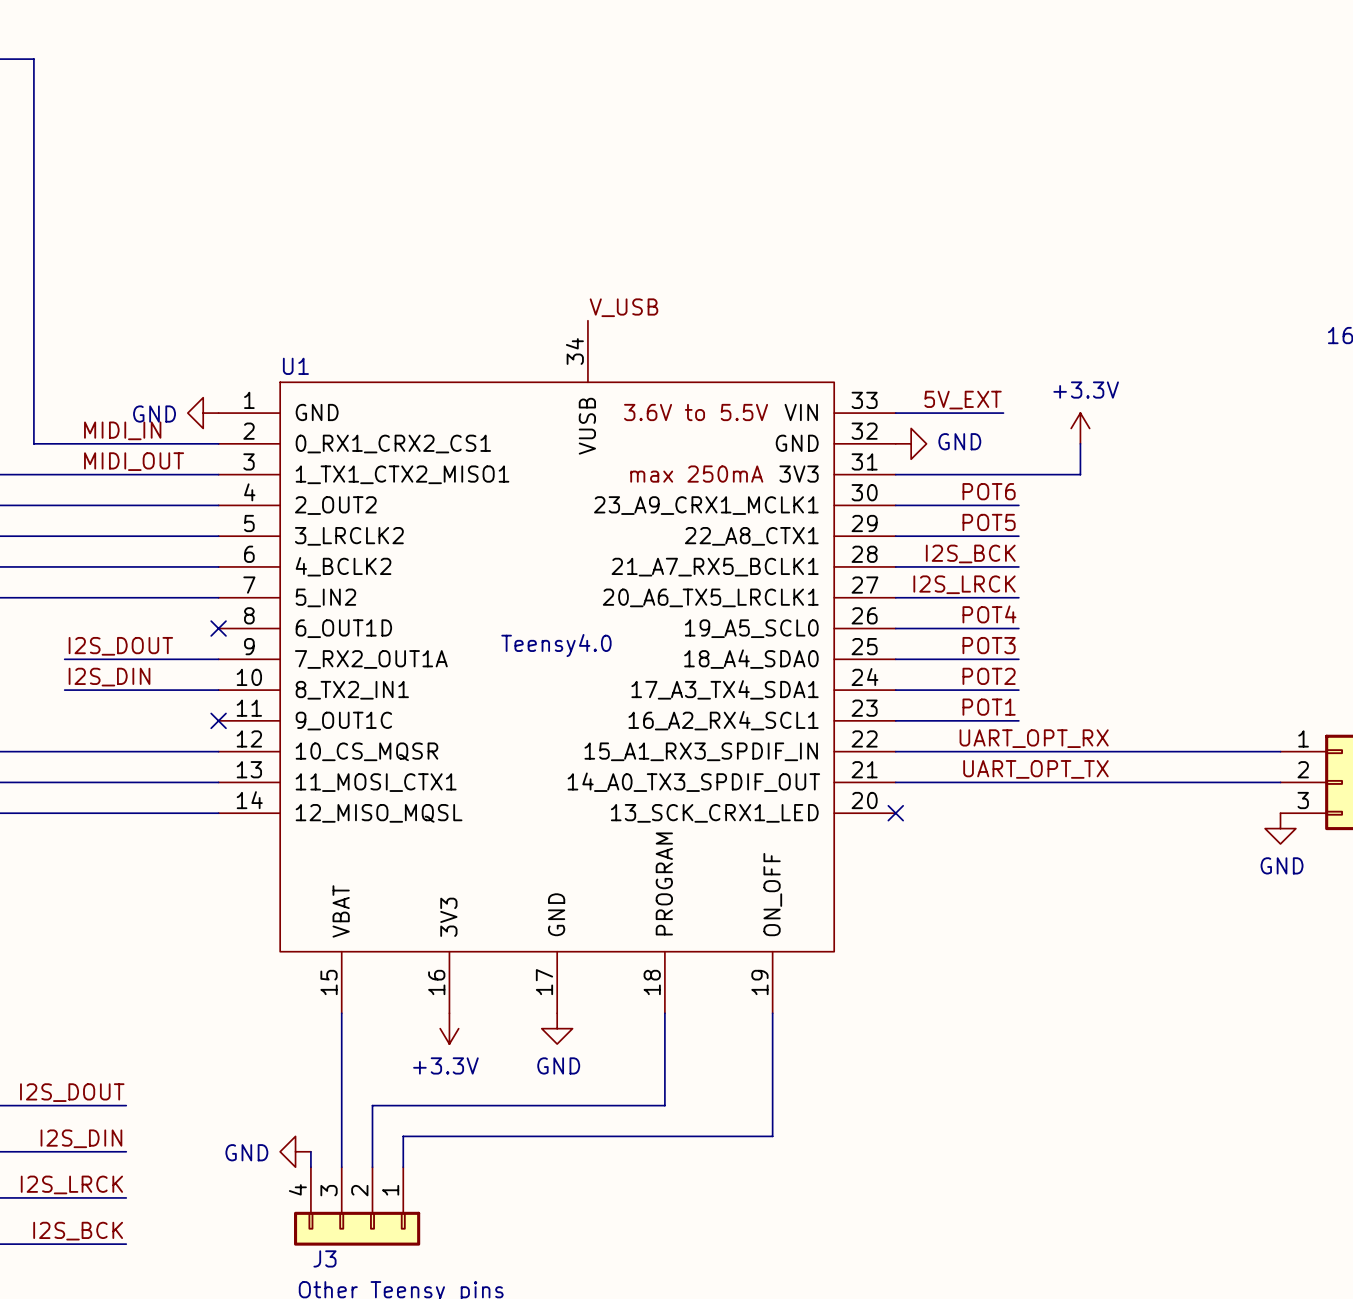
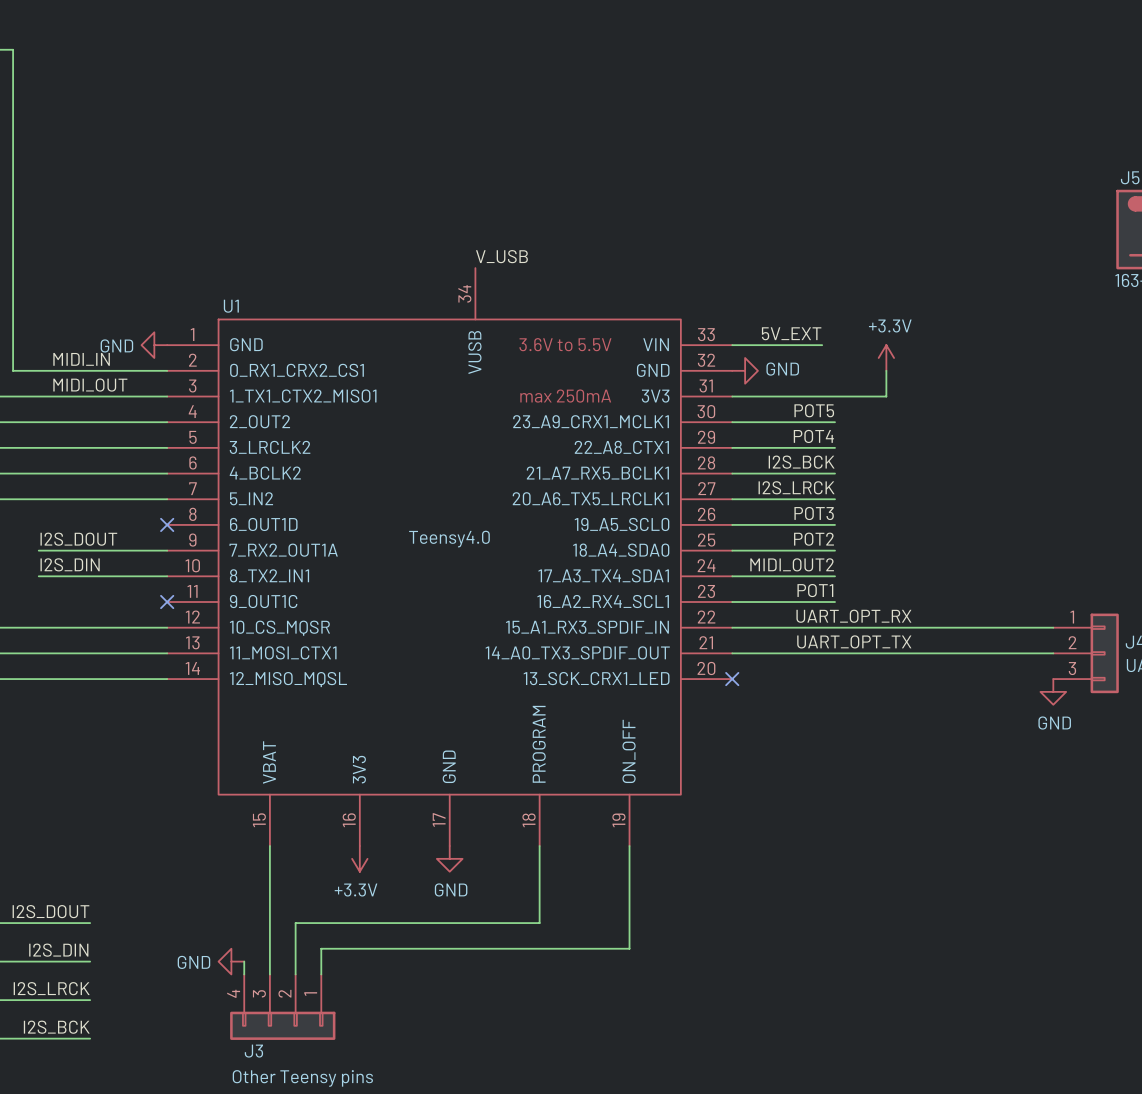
label: POT6 (989, 491) -> POT5 (814, 410)
label: POT5 (989, 522) -> POT4 (813, 436)
label: POT4 (989, 614) -> POT3 (814, 513)
label: POT3 (989, 645) -> POT2 (813, 539)
label: POT2 (989, 676) -> MIDI_OUT2 (792, 564)

